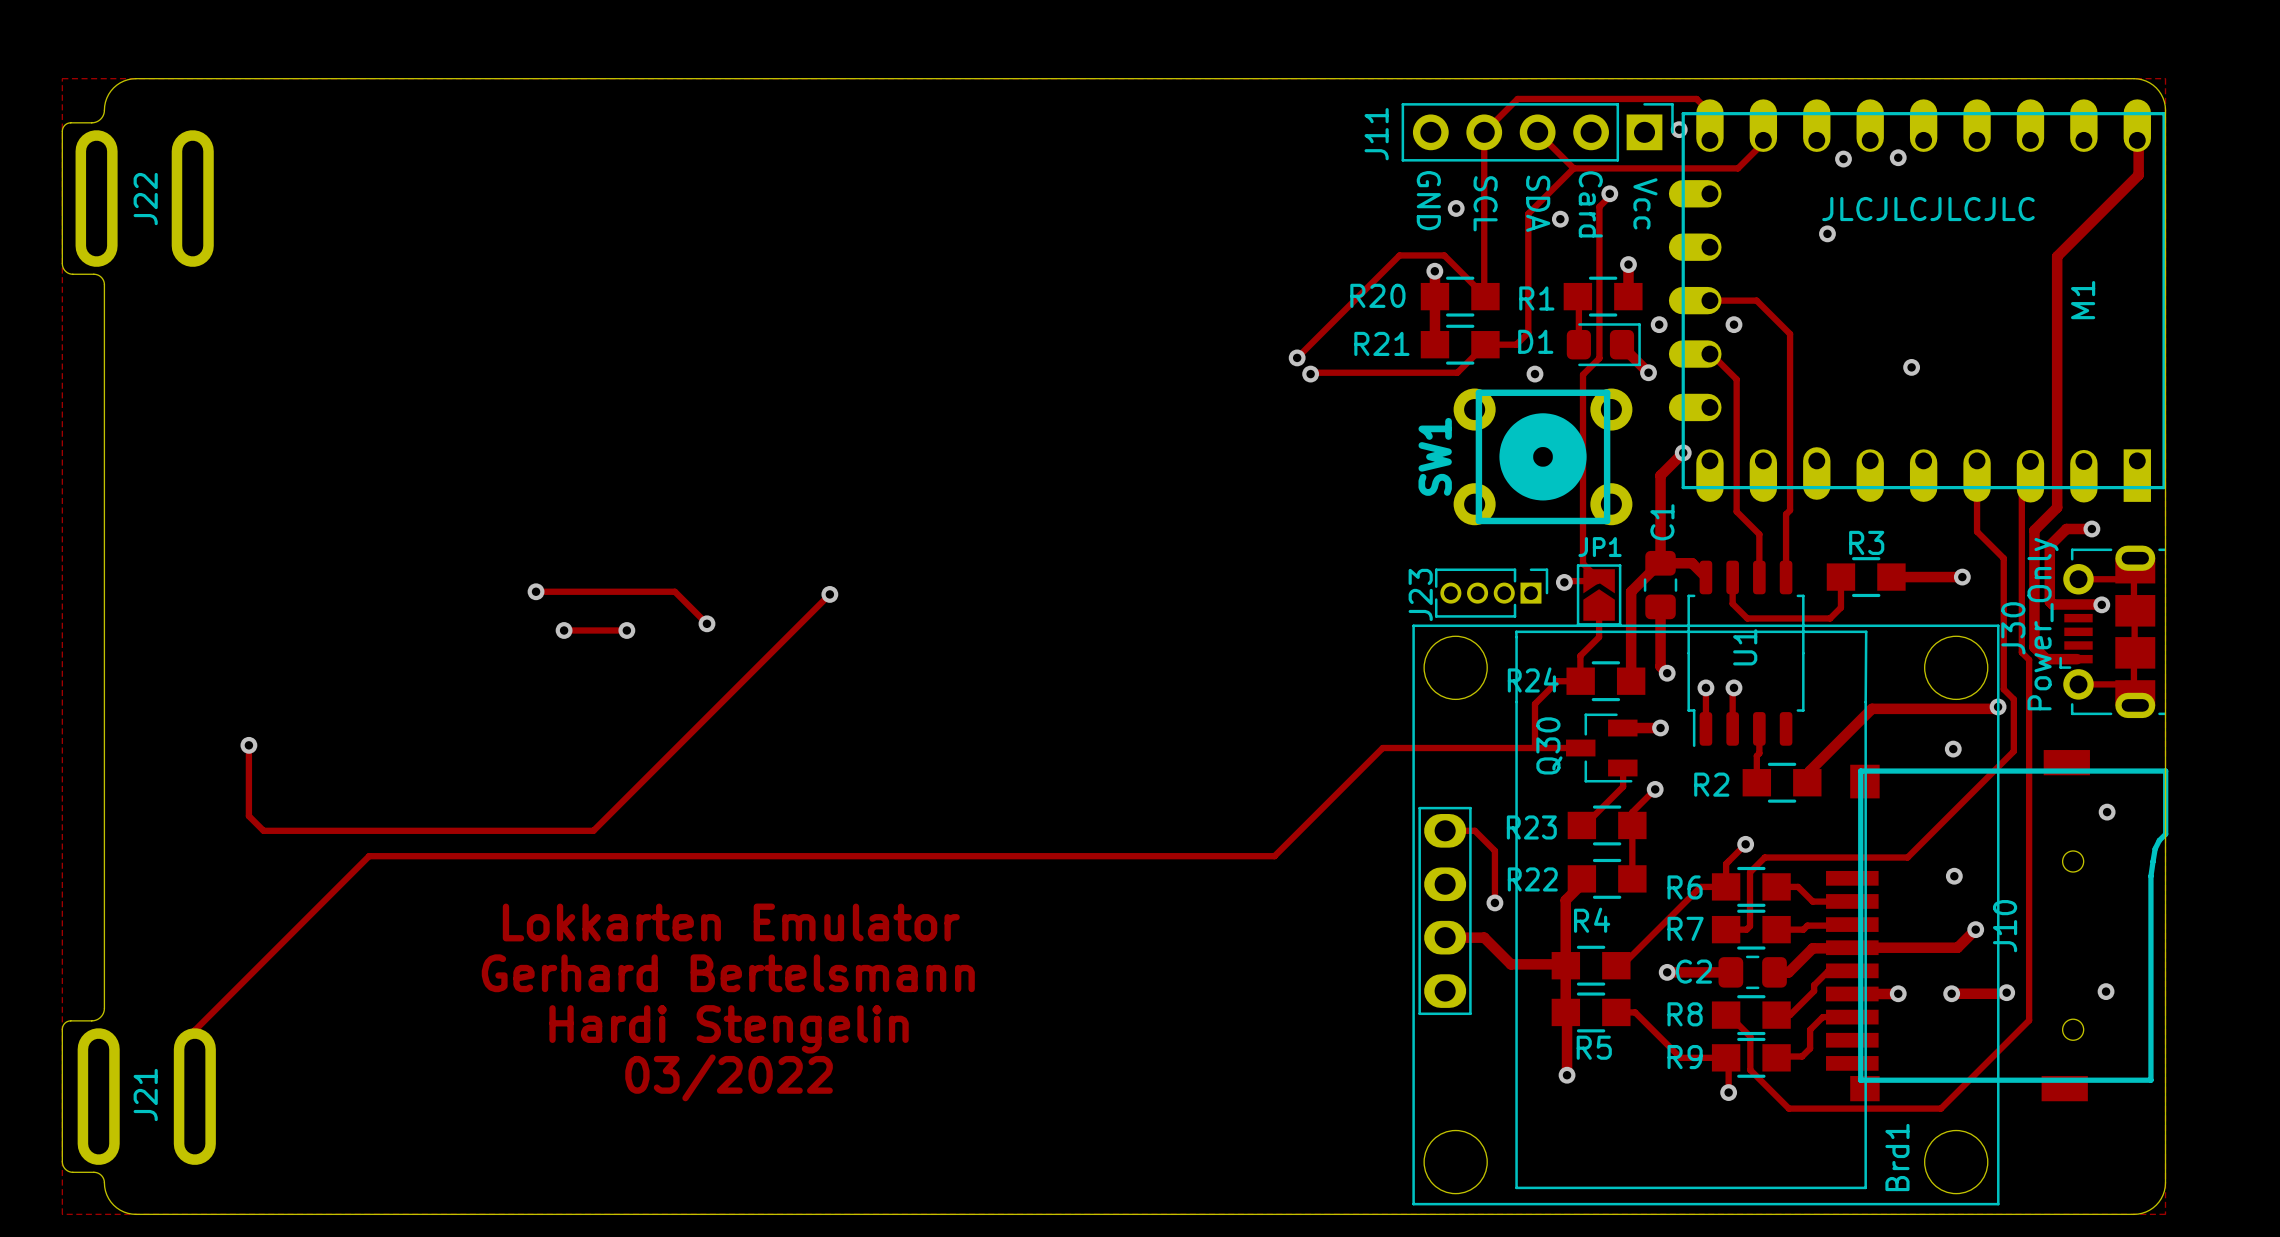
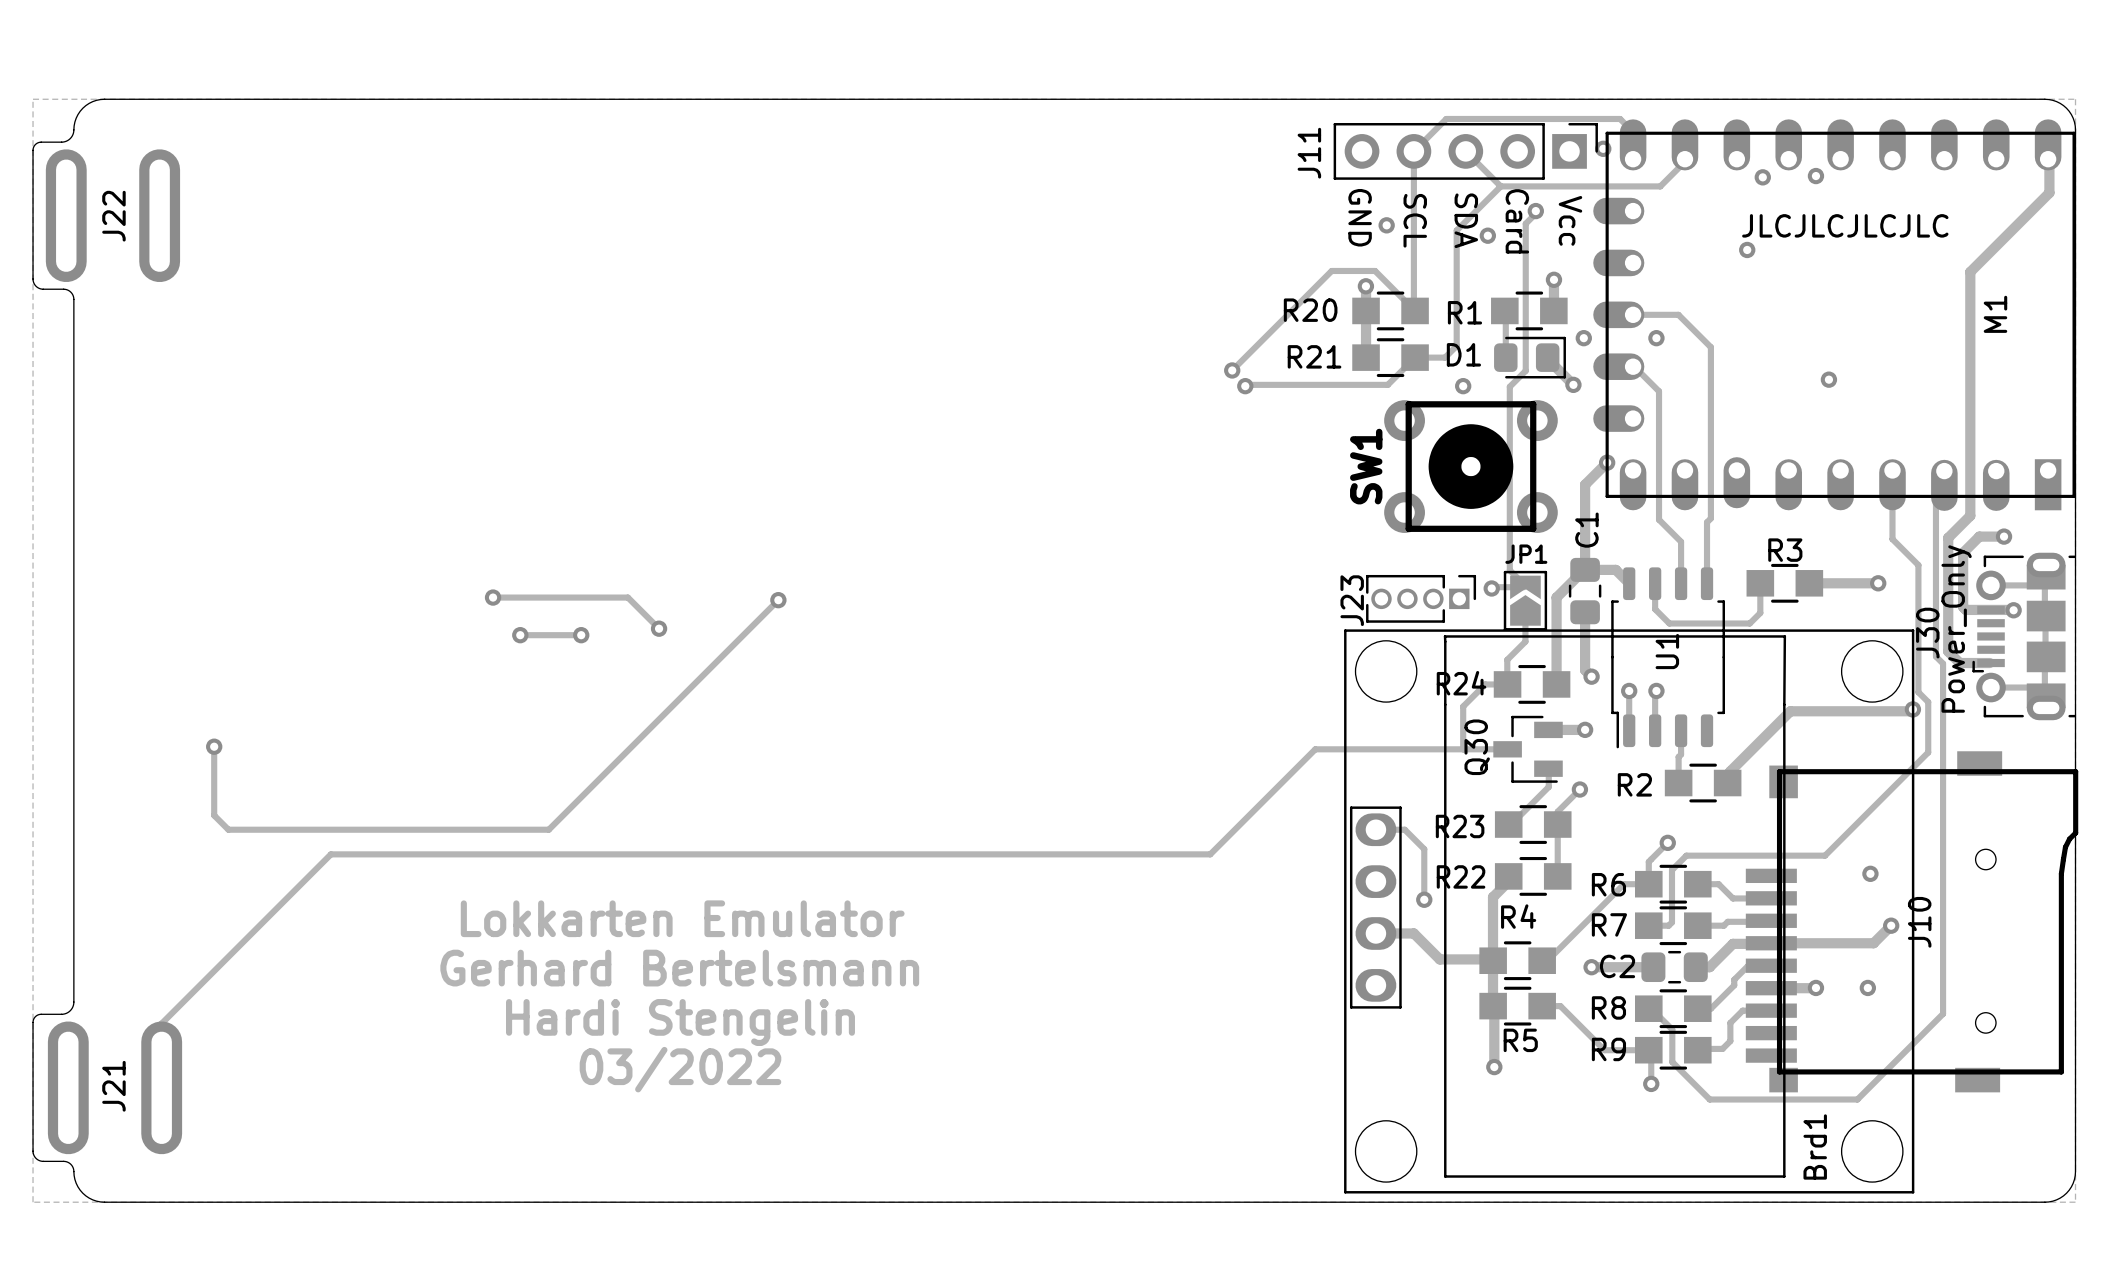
via: (1953, 749) -> none
via: (2107, 812) -> none
via: (2106, 991) -> none
track: (2006, 992) (1951, 993) -> none
via: (2006, 992) -> none

